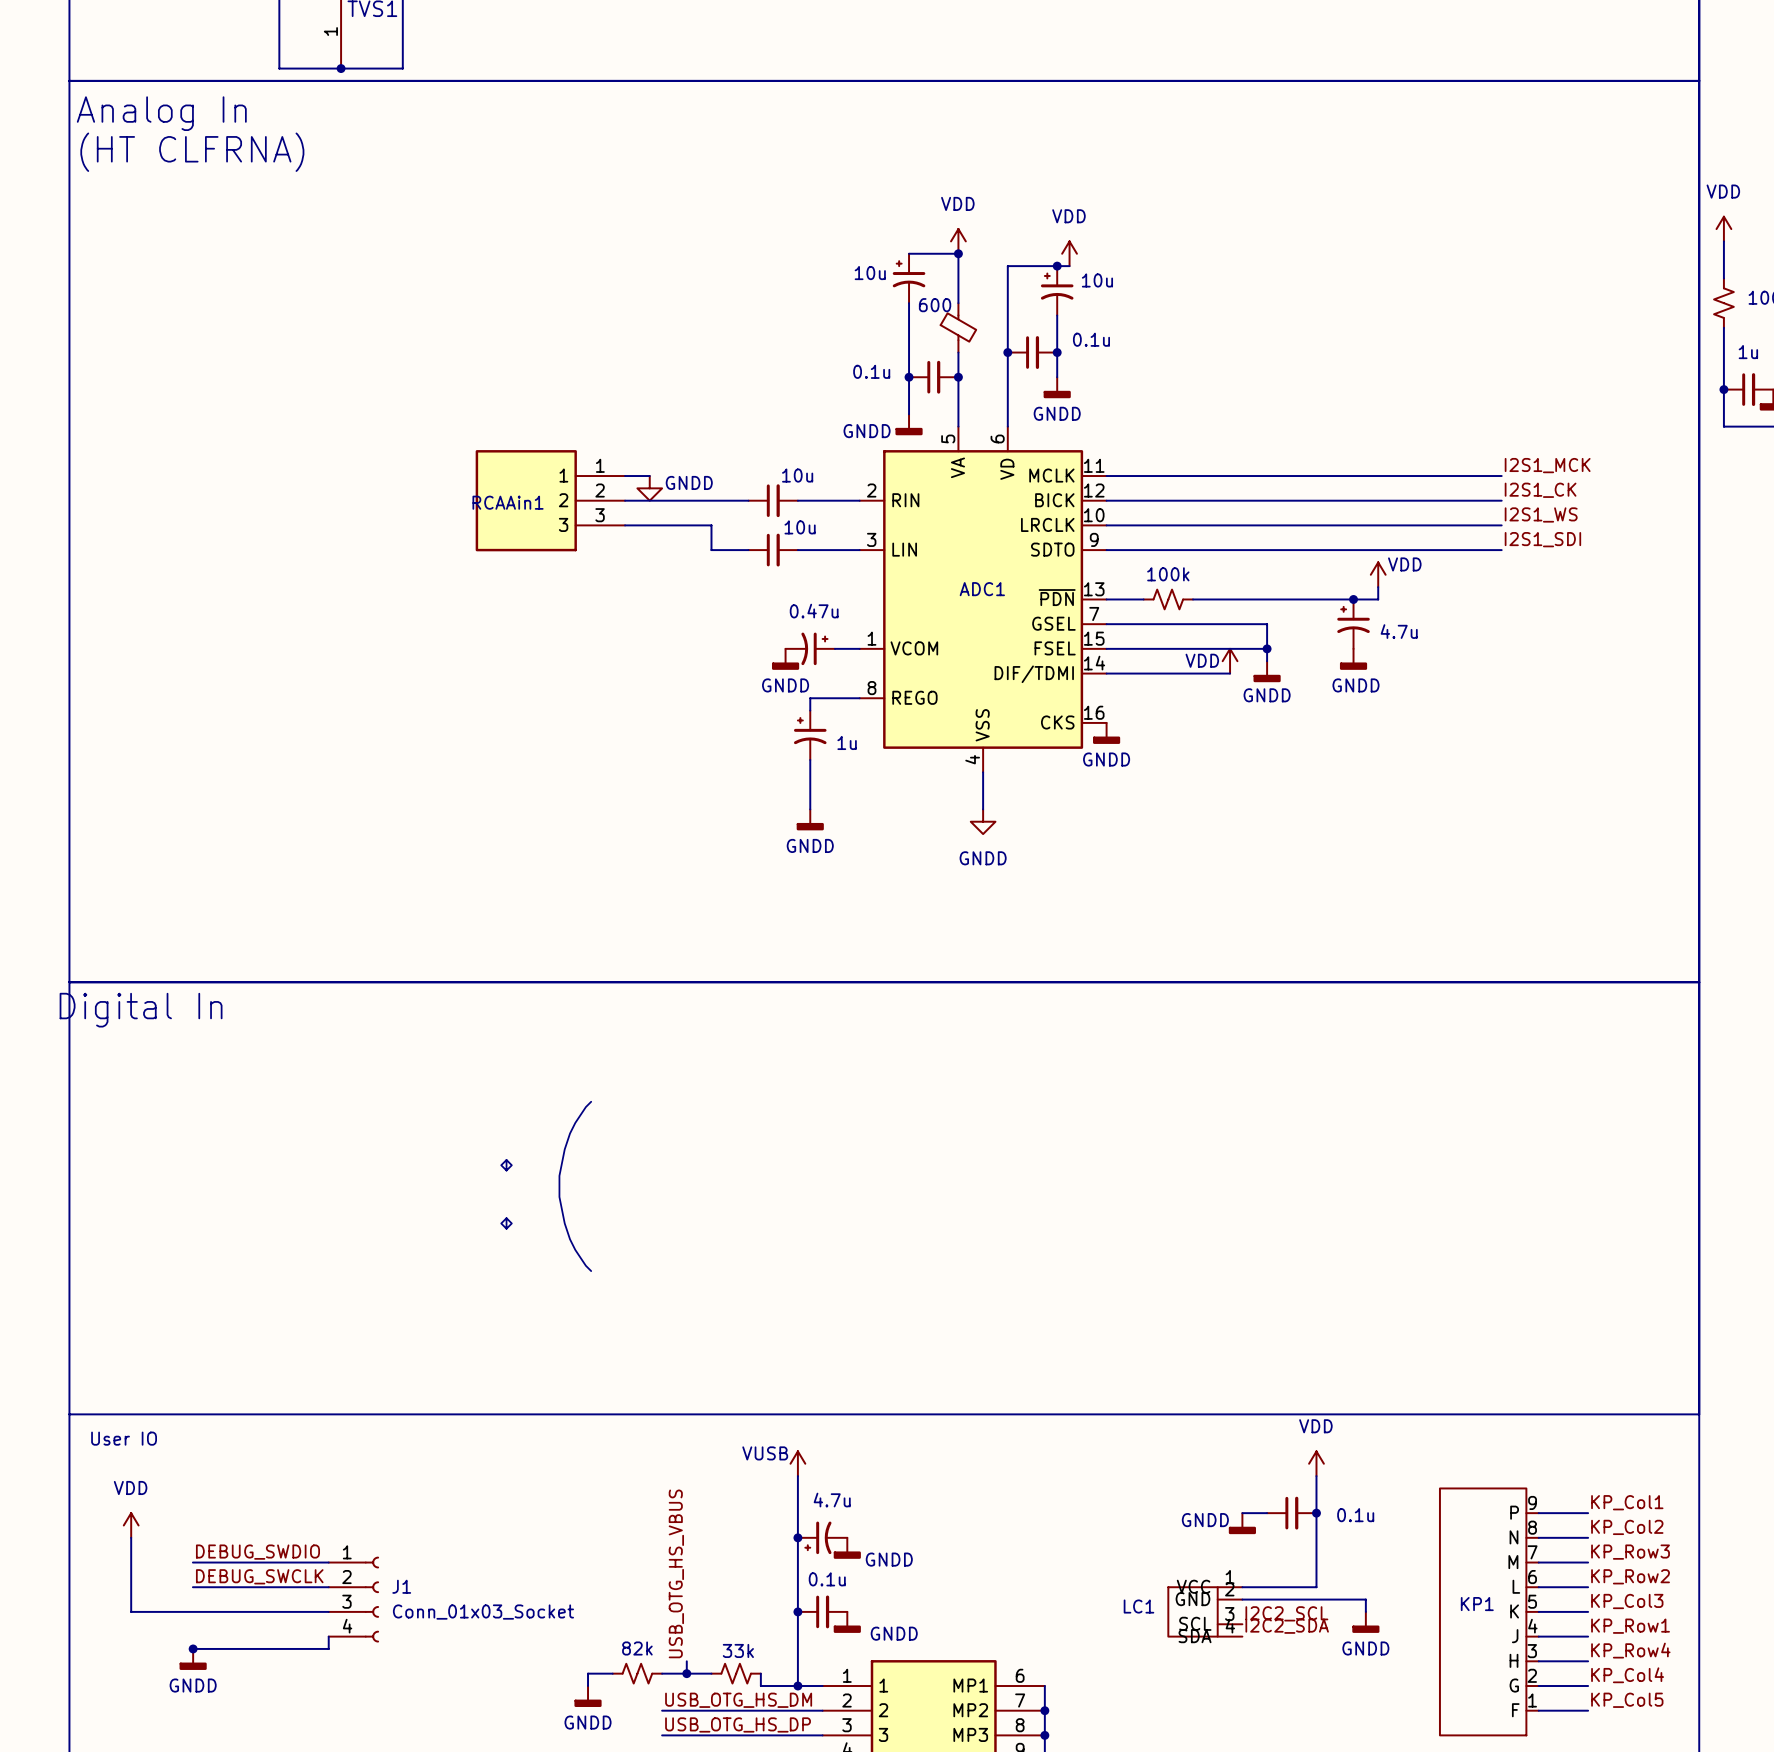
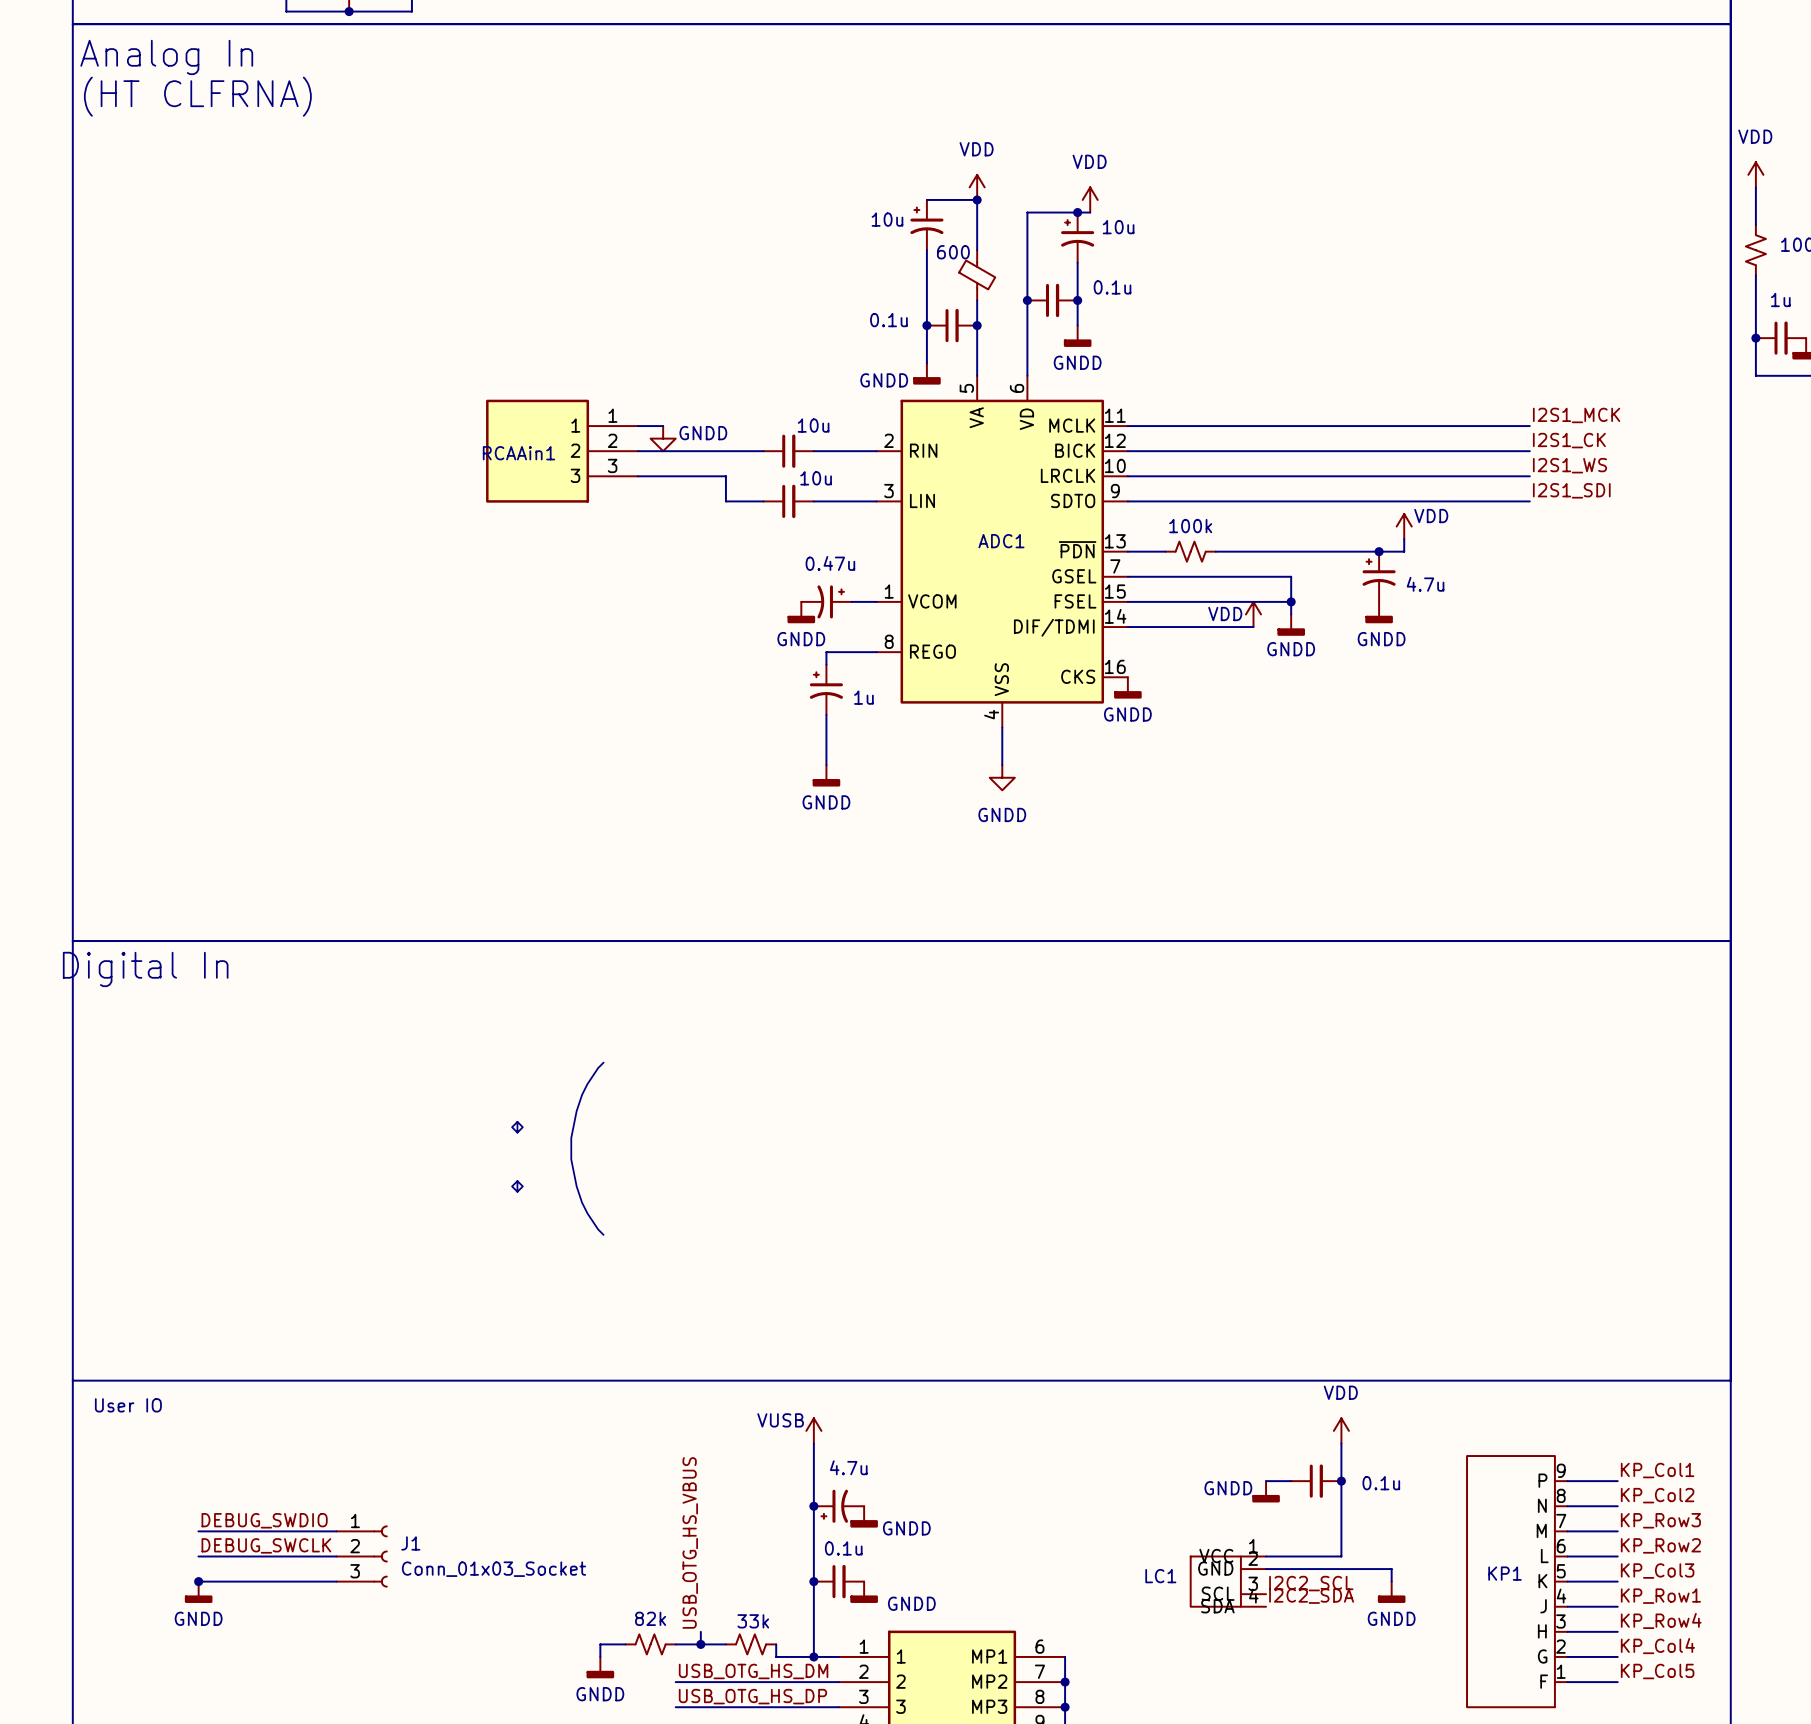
power symbol: VDD (131, 1525) -> none
wire: (131, 1537) (131, 1611) (192, 1611) -> none
J1 symbol: [328, 1556, 379, 1643] -> [336, 1525, 388, 1588]
wire: (328, 1636) (328, 1648) (192, 1648) -> none
junction position: (193, 1648) -> (198, 1581)
power symbol position: GNDD (193, 1659) -> GNDD (198, 1592)

